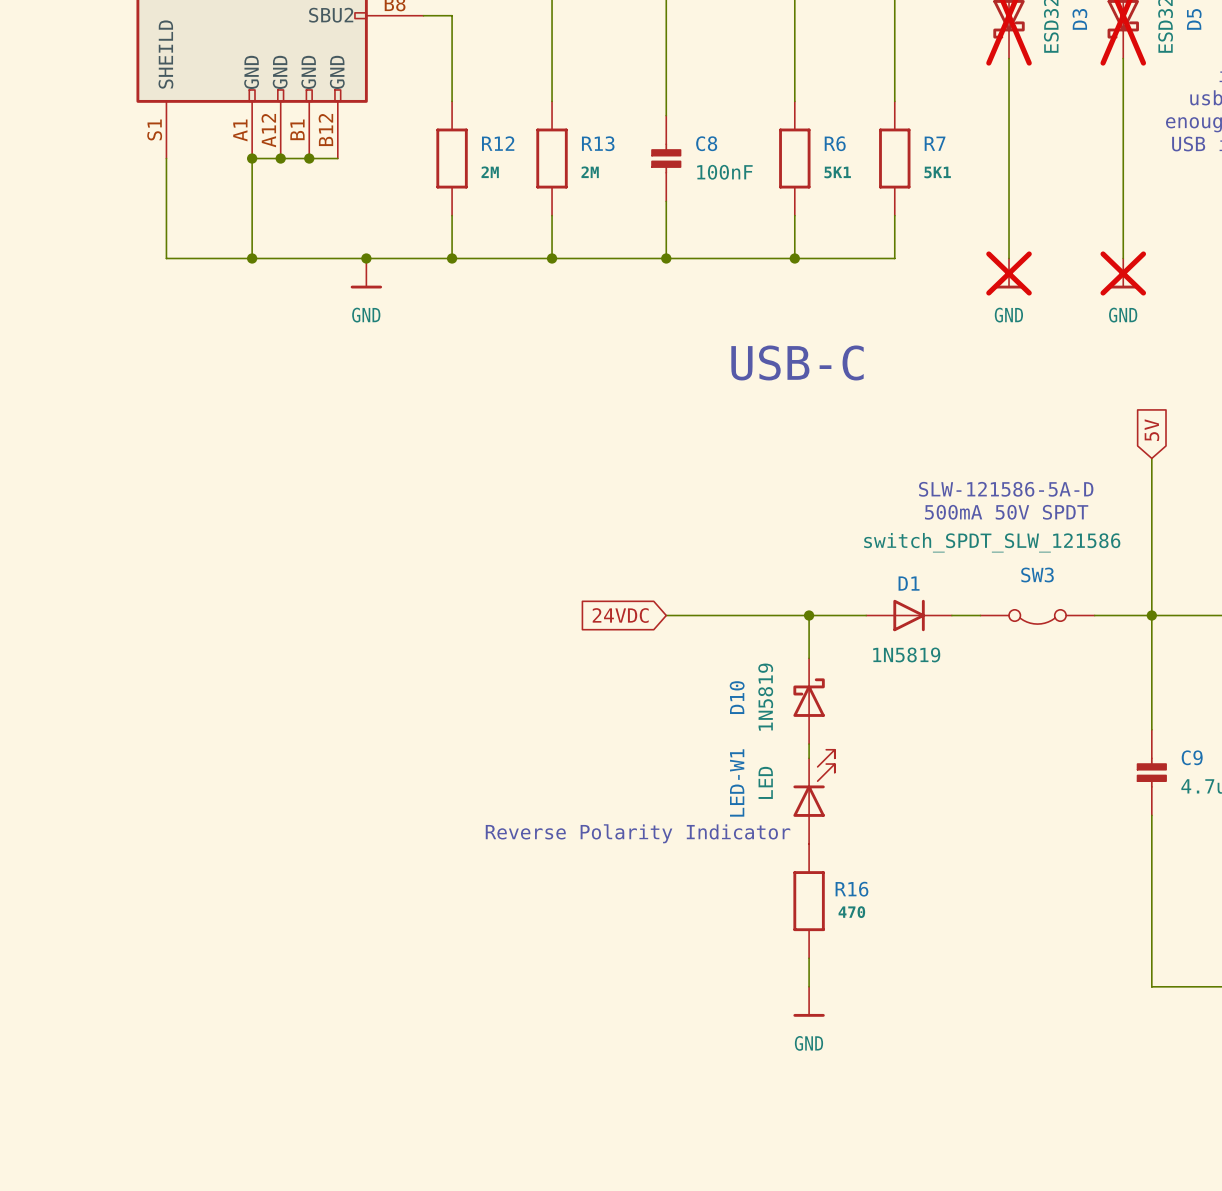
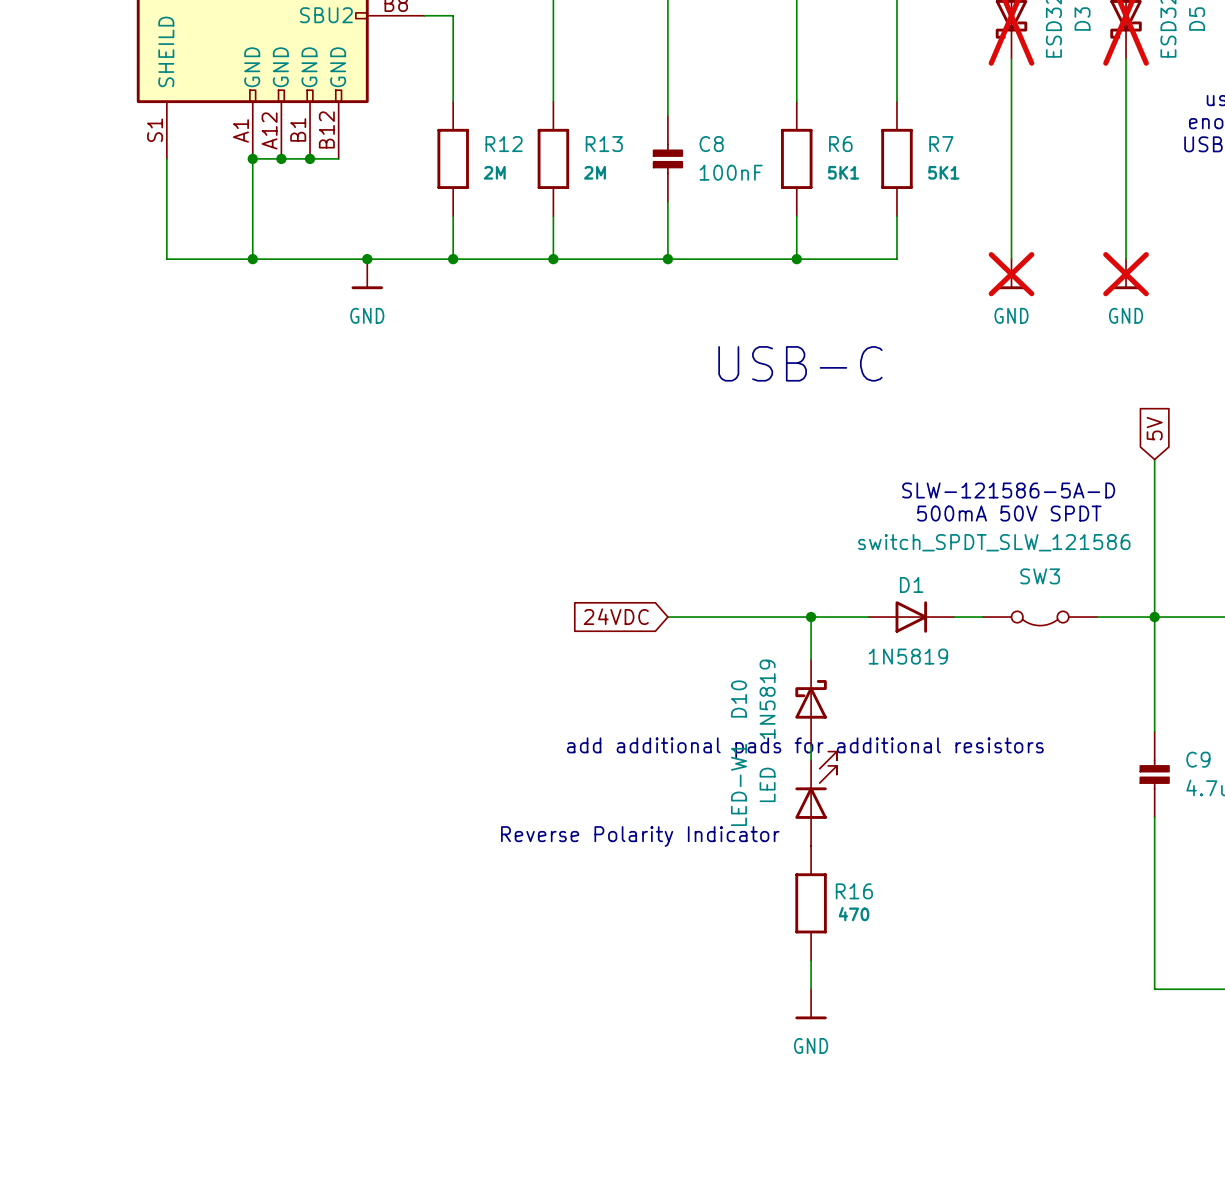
text: none -> add additional pads for additional resistors (805, 747)

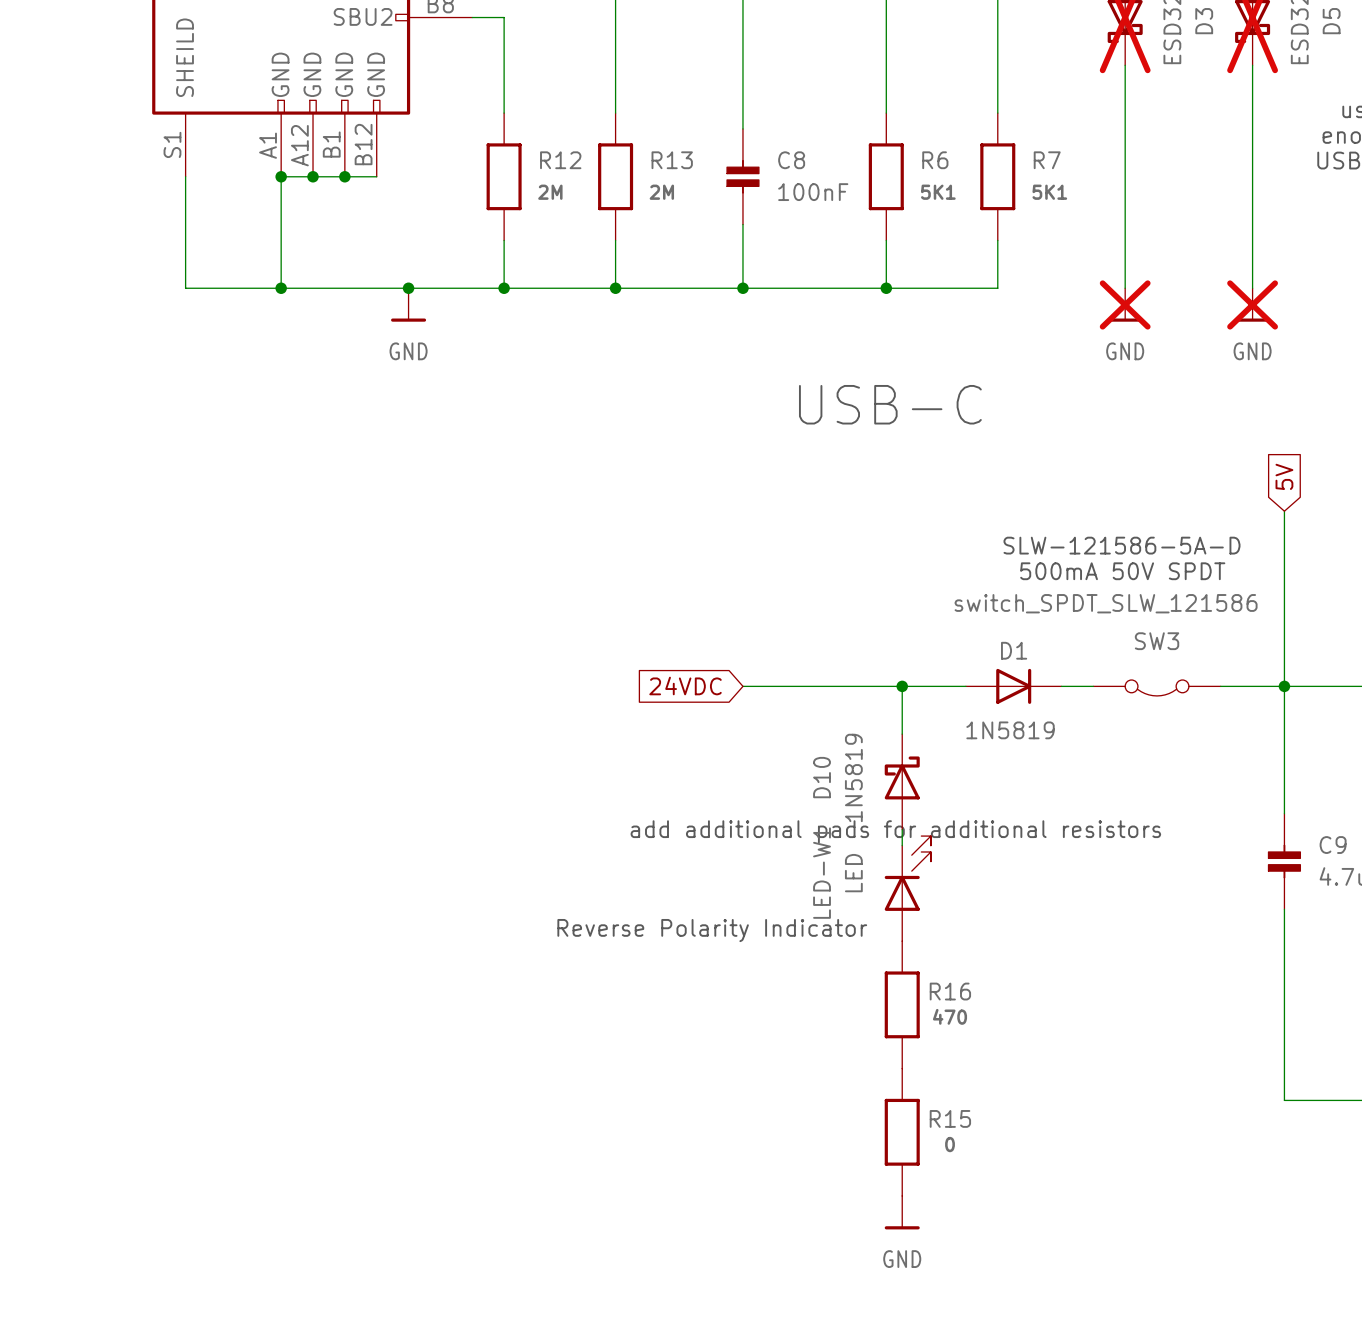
power symbol position: GND (811, 1004) -> GND (902, 1212)
R15: none -> 0 (902, 1132)

